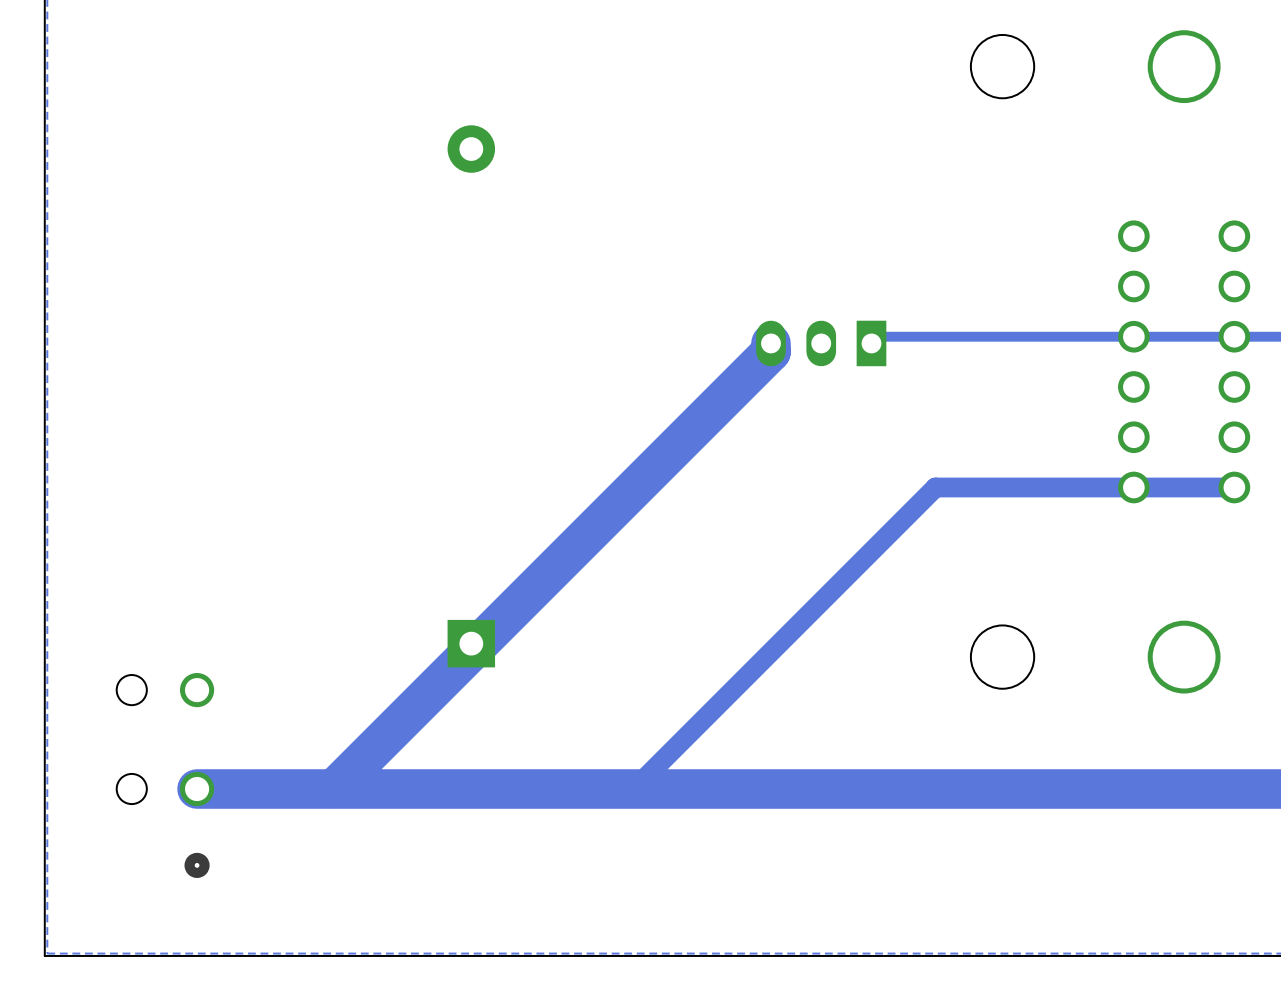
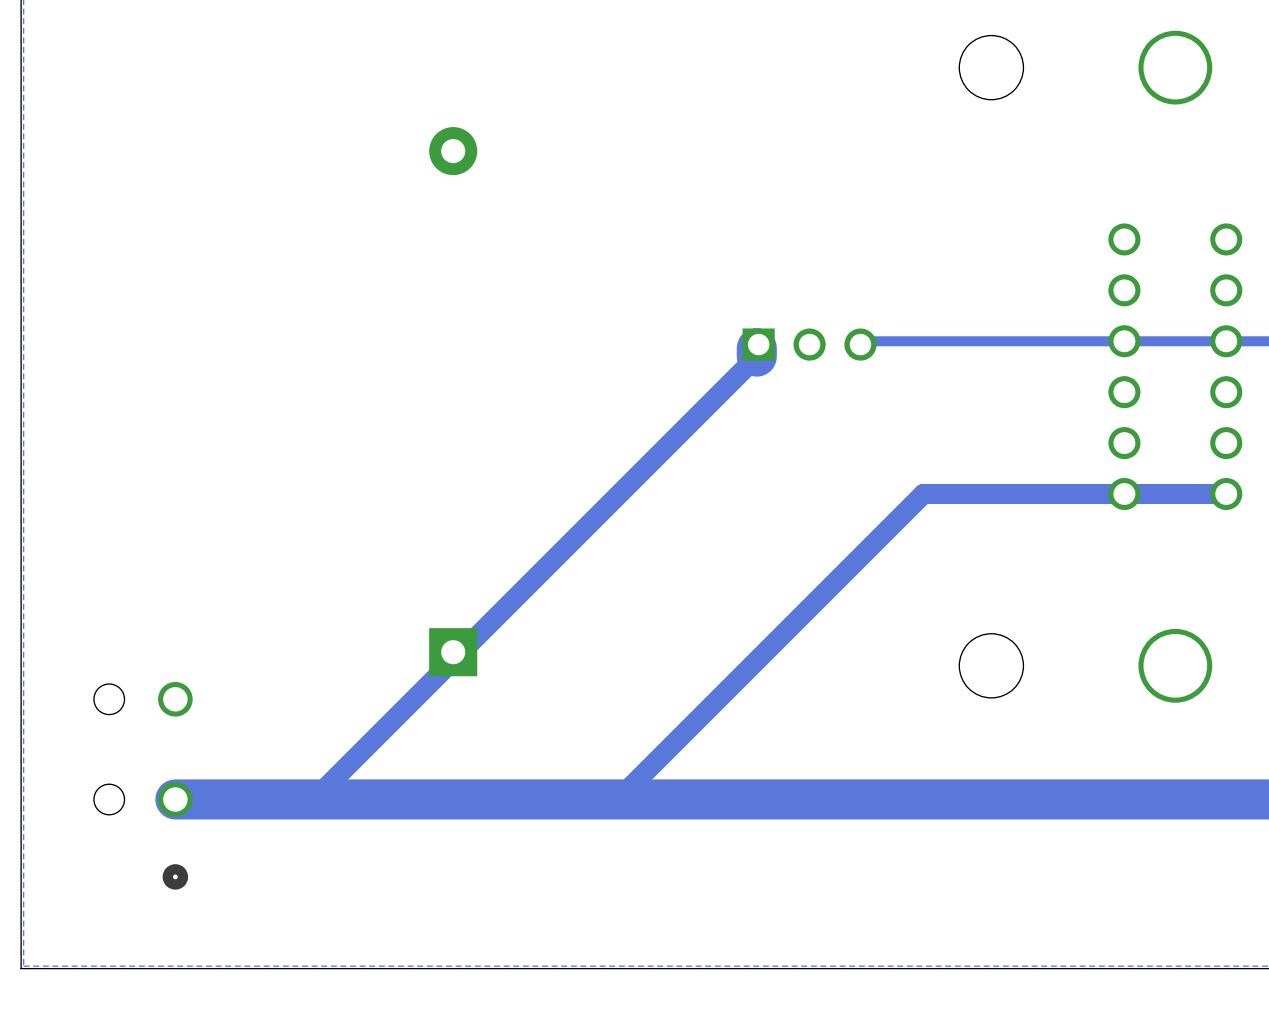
part footprint: [756, 320, 887, 367] -> [742, 328, 877, 361]
track width: thick (770, 351) (334, 788) -> thin (756, 356) (314, 798)

